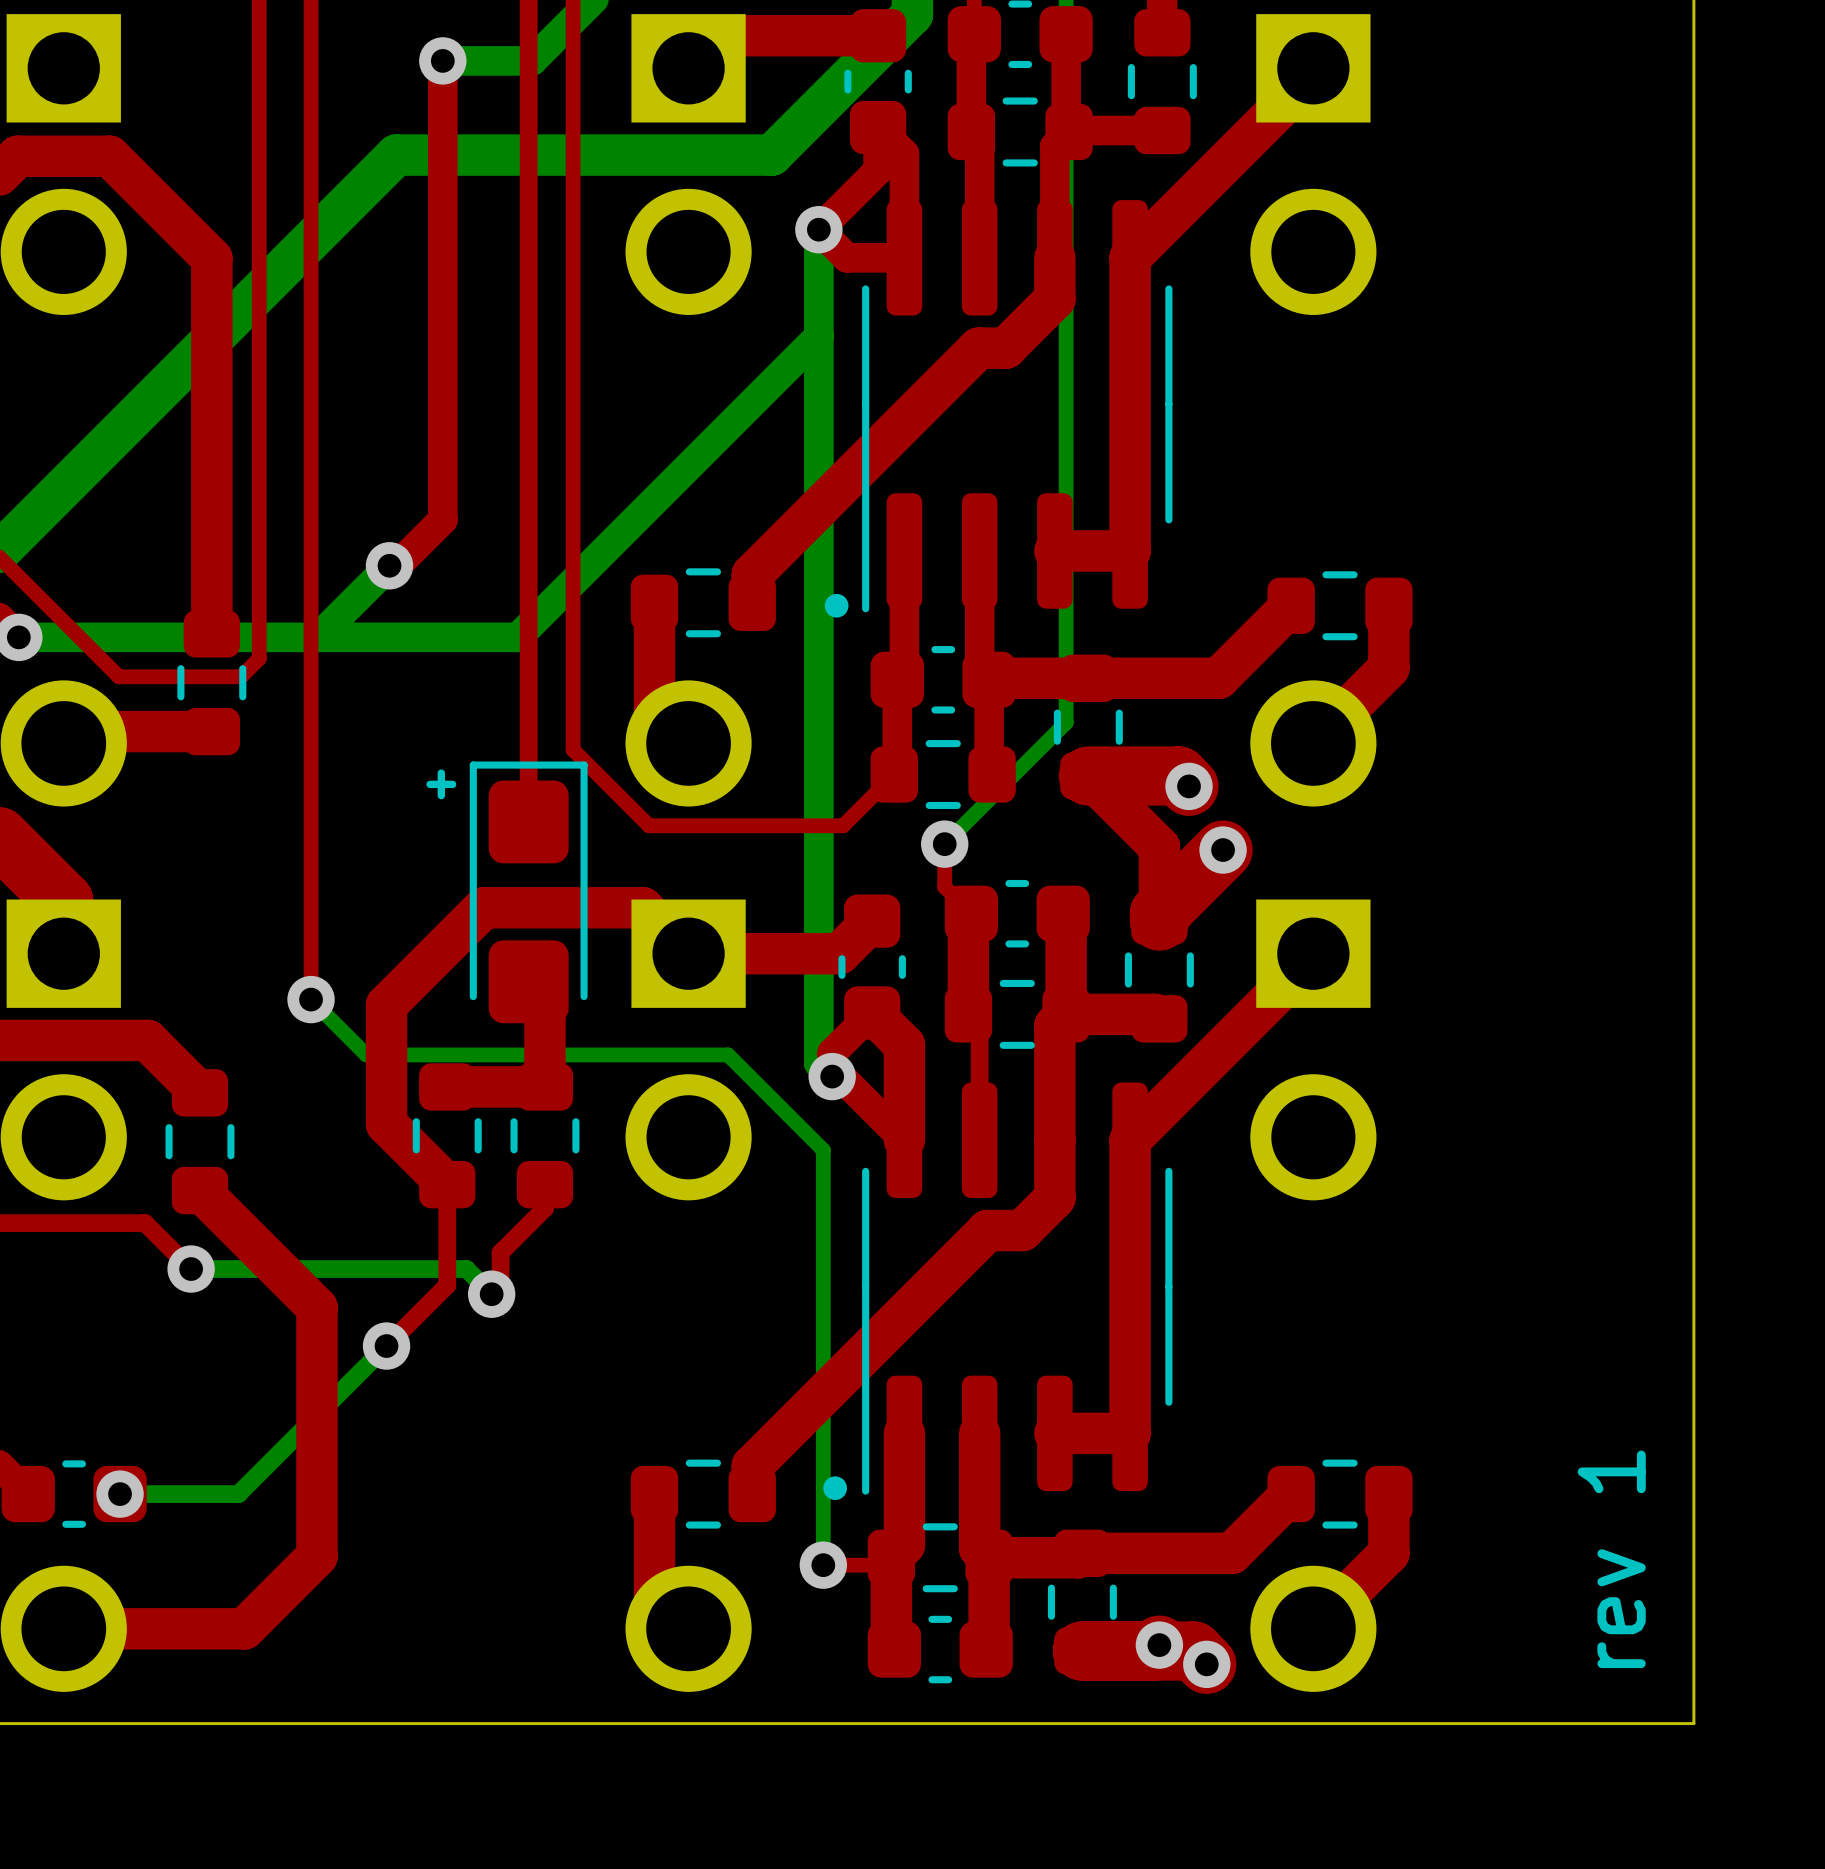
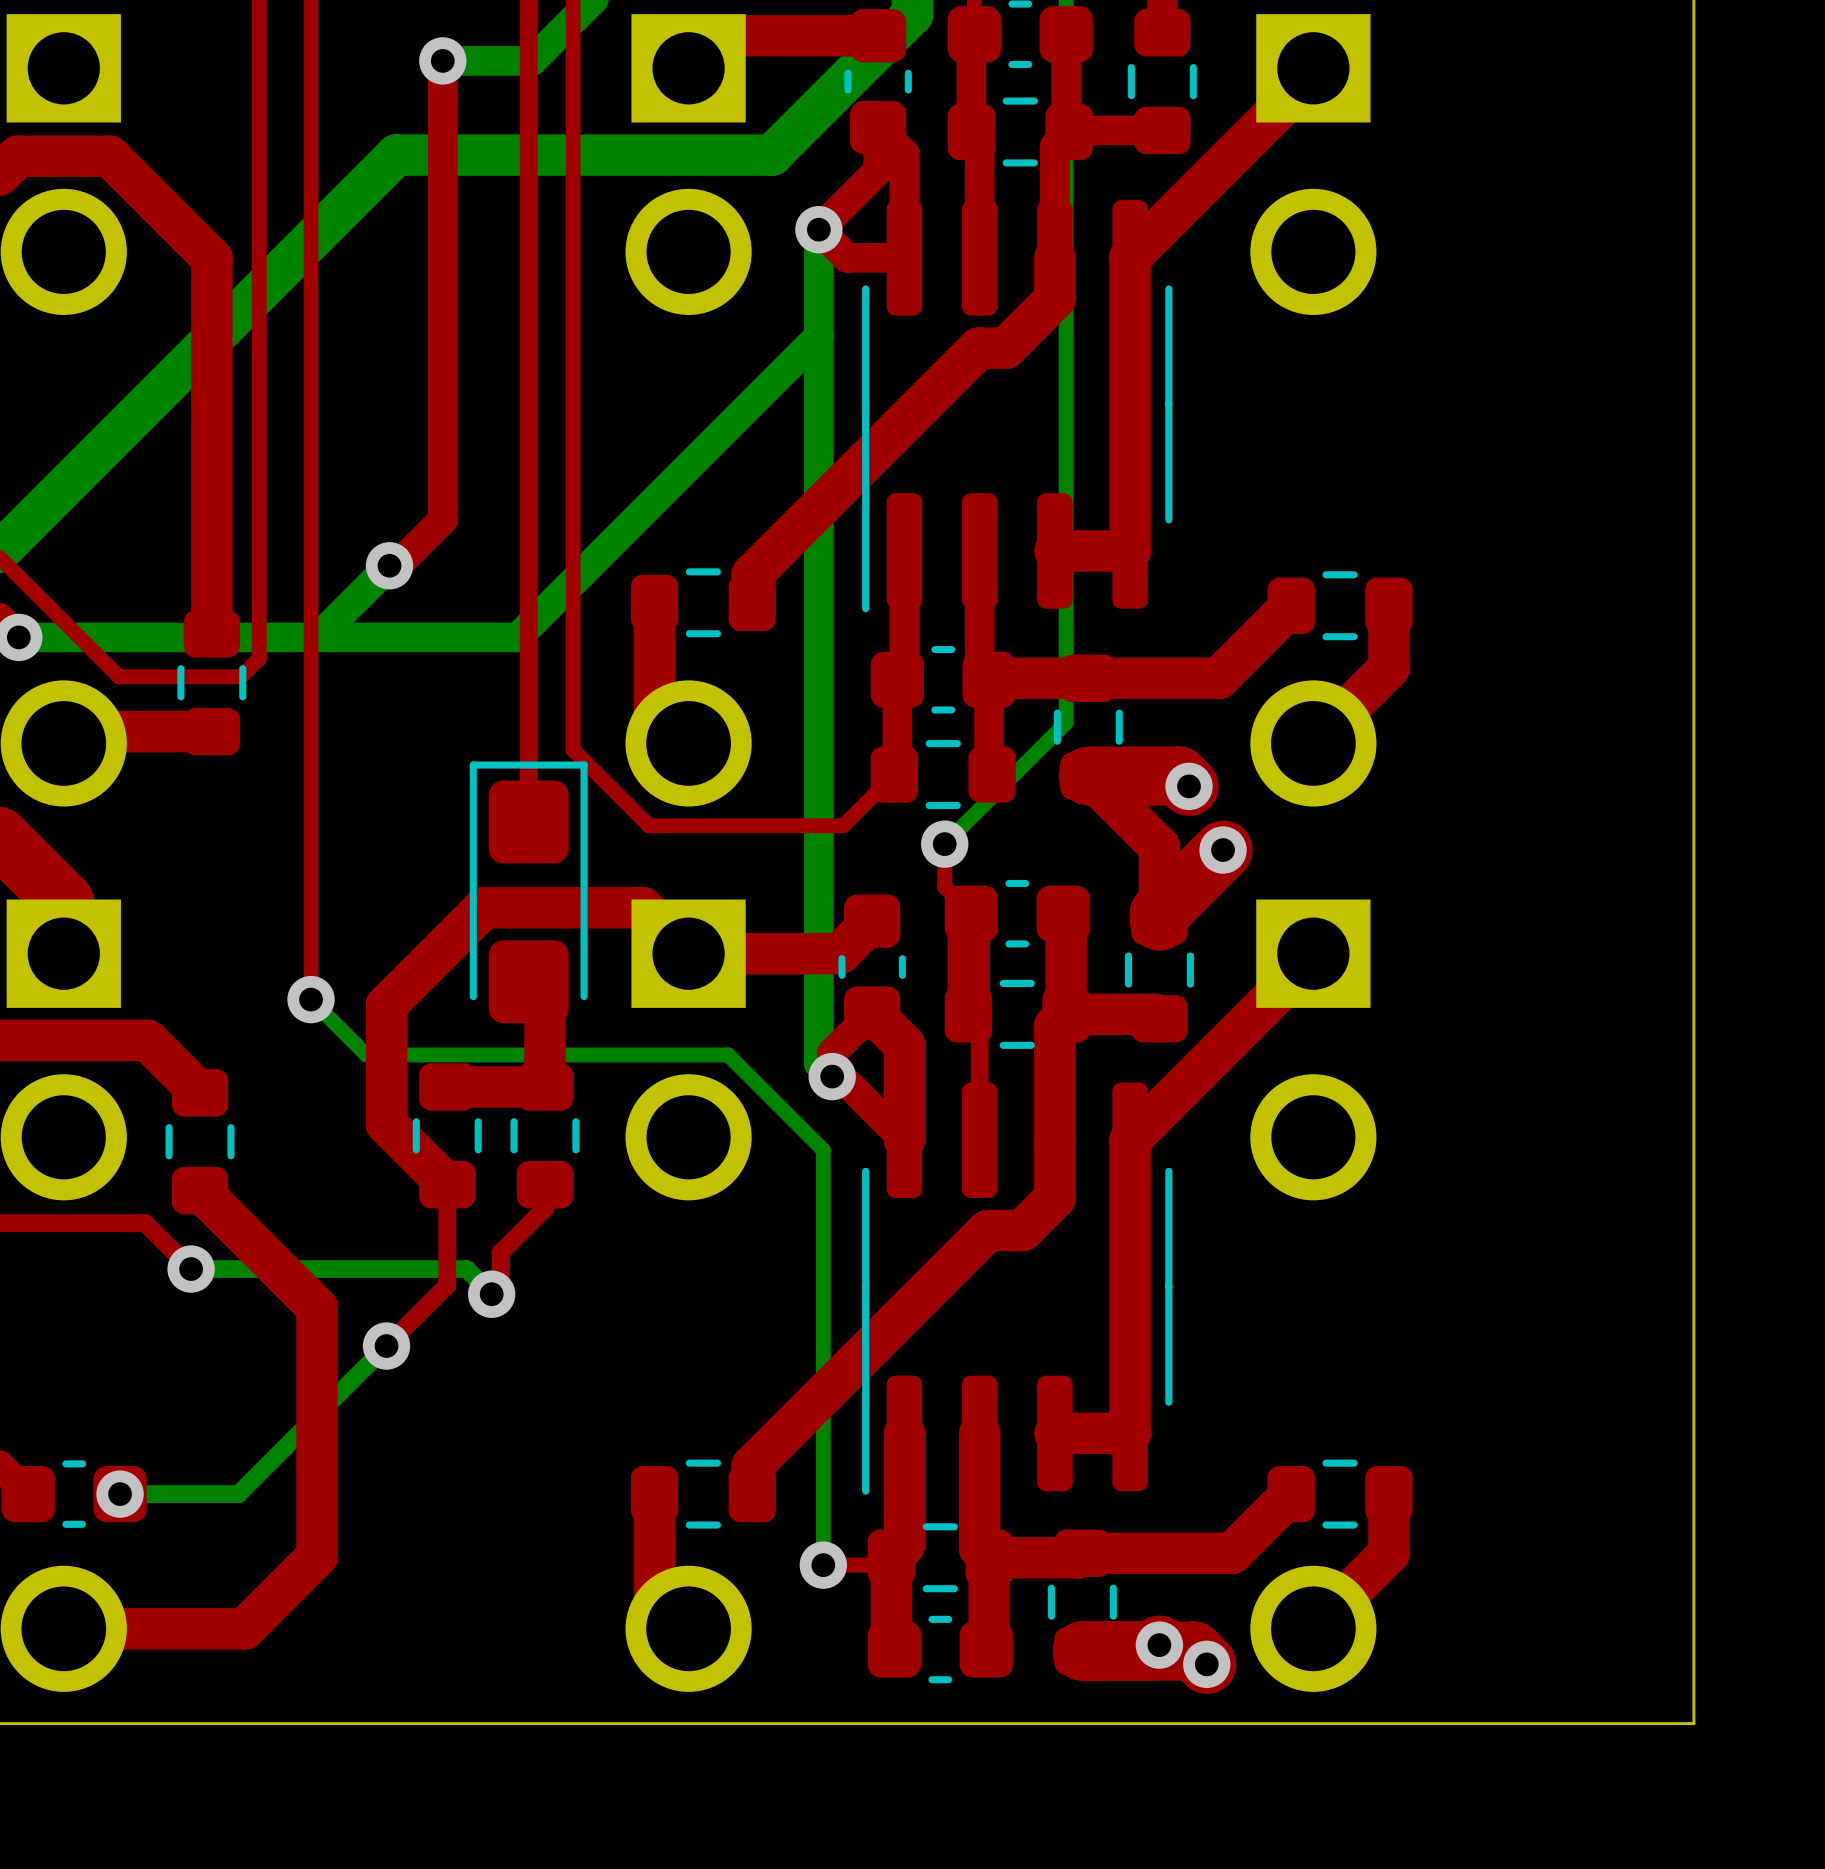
drawing: [824, 593, 849, 618] -> none
text: + (441, 784) -> none
drawing: [823, 1476, 848, 1501] -> none
text: rev 1 (1611, 1559) -> none

